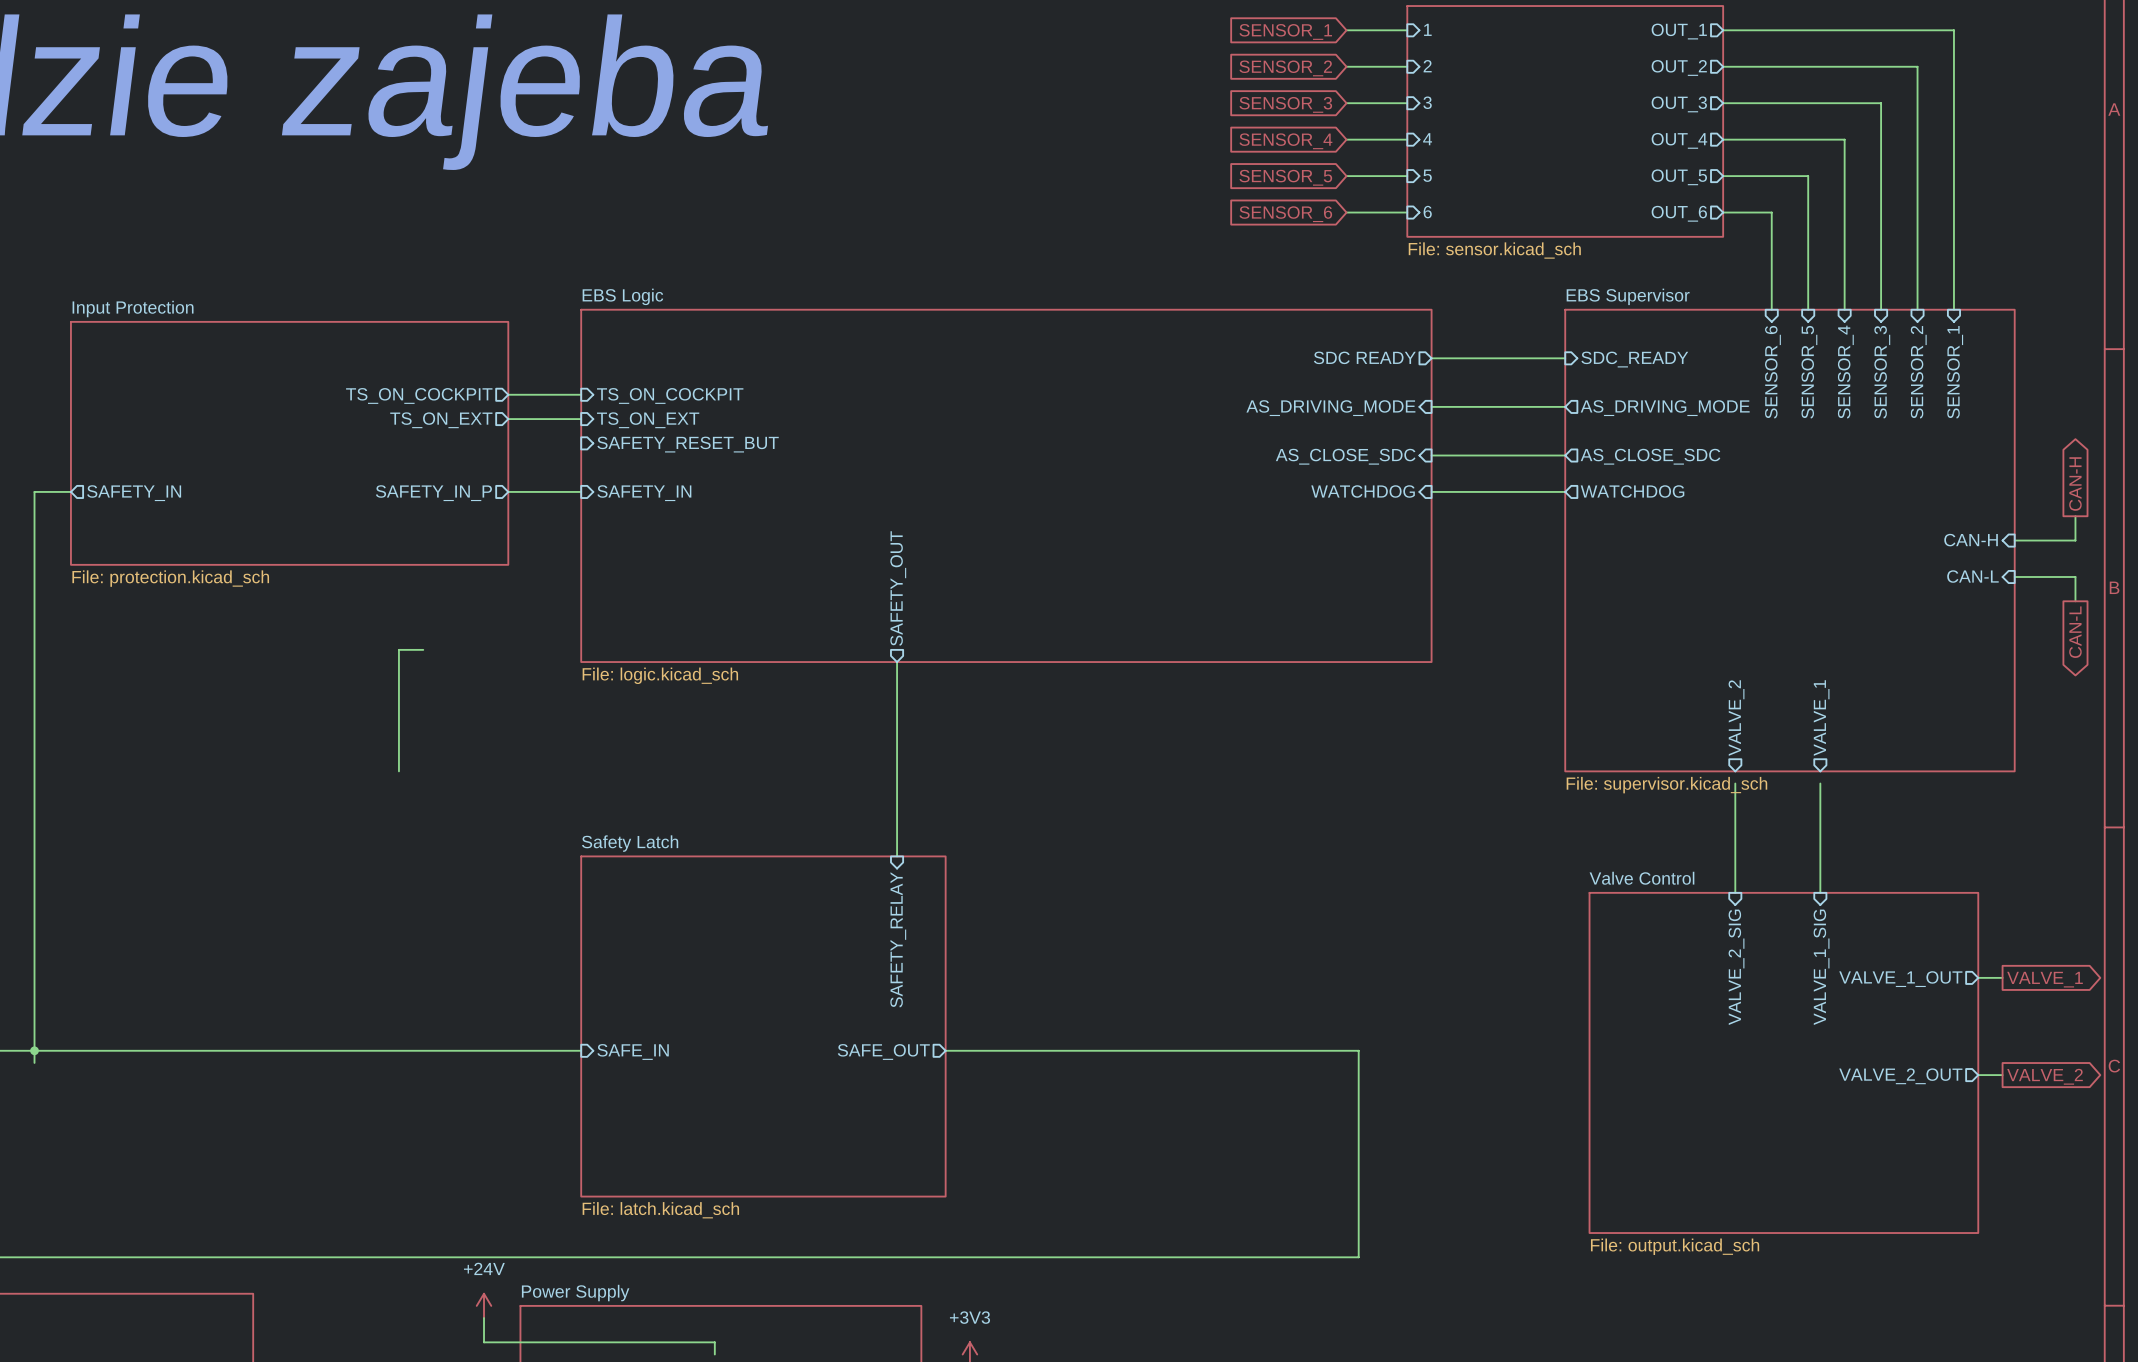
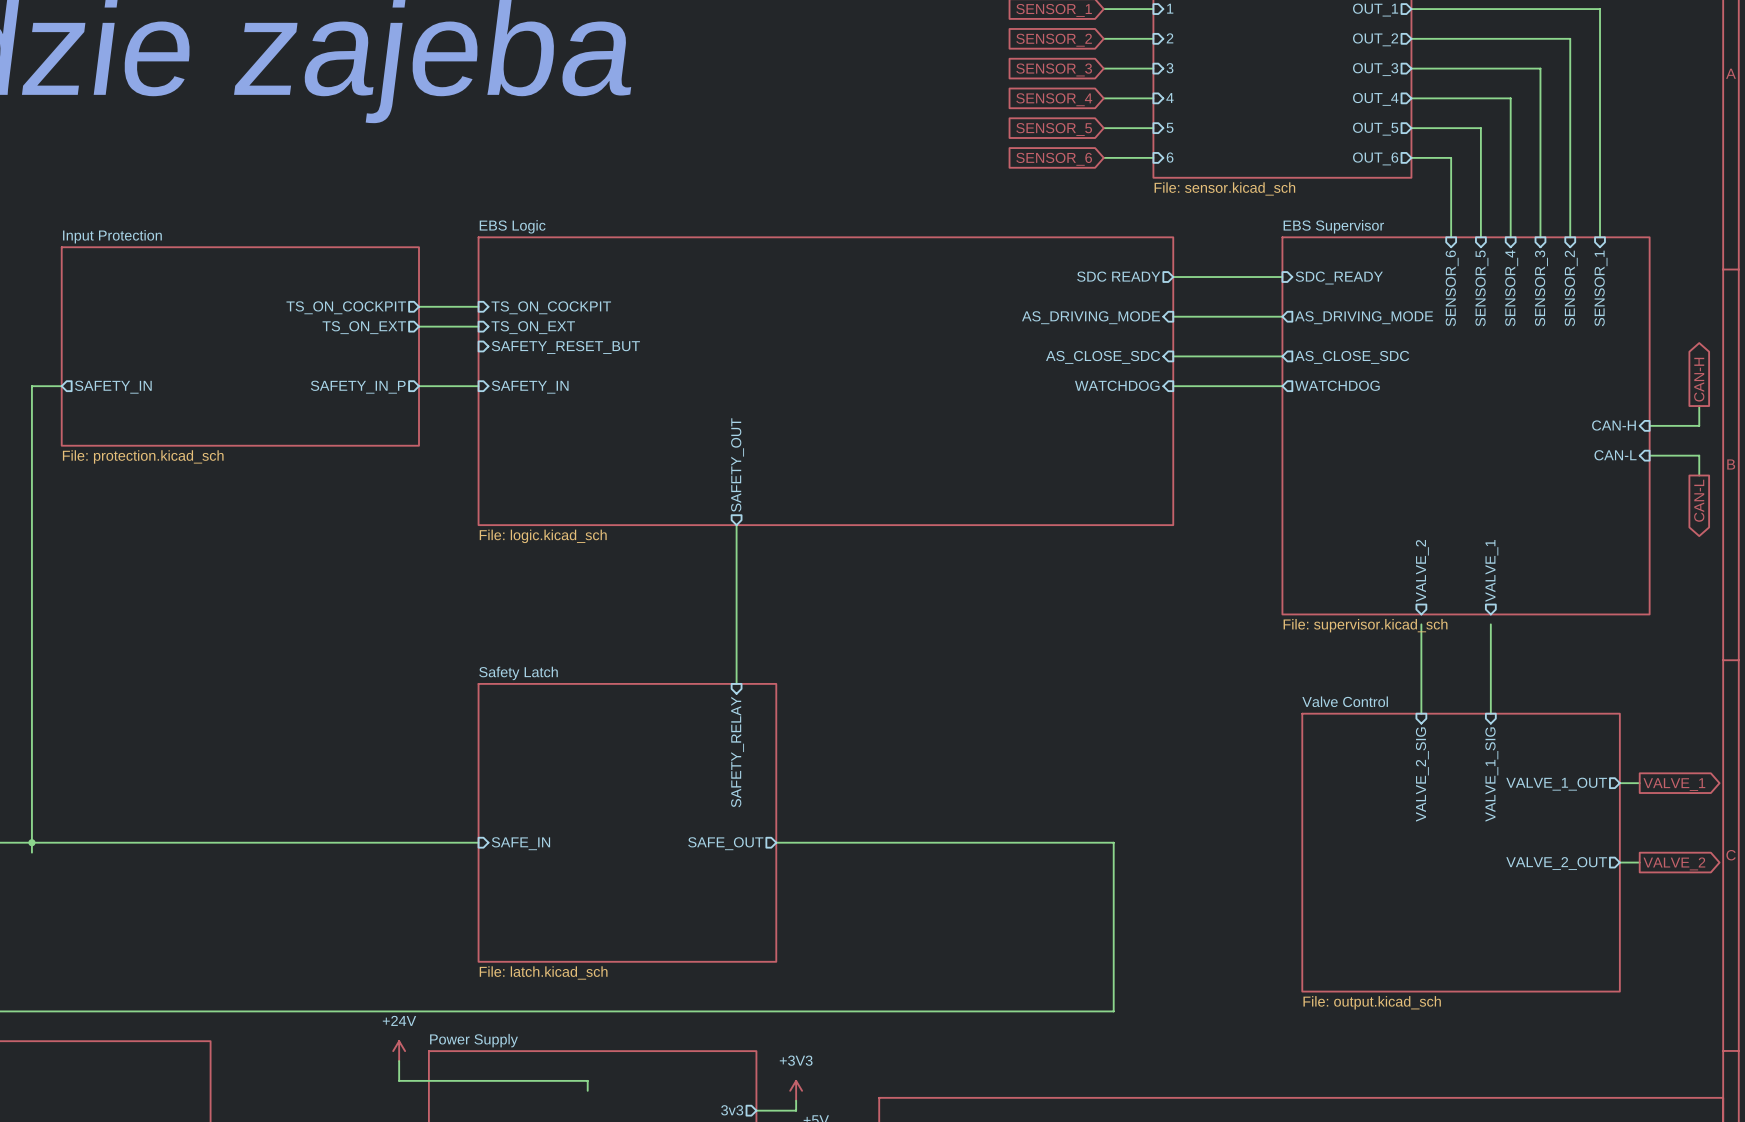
wire: (423, 649) (398, 649) (398, 771) -> none

